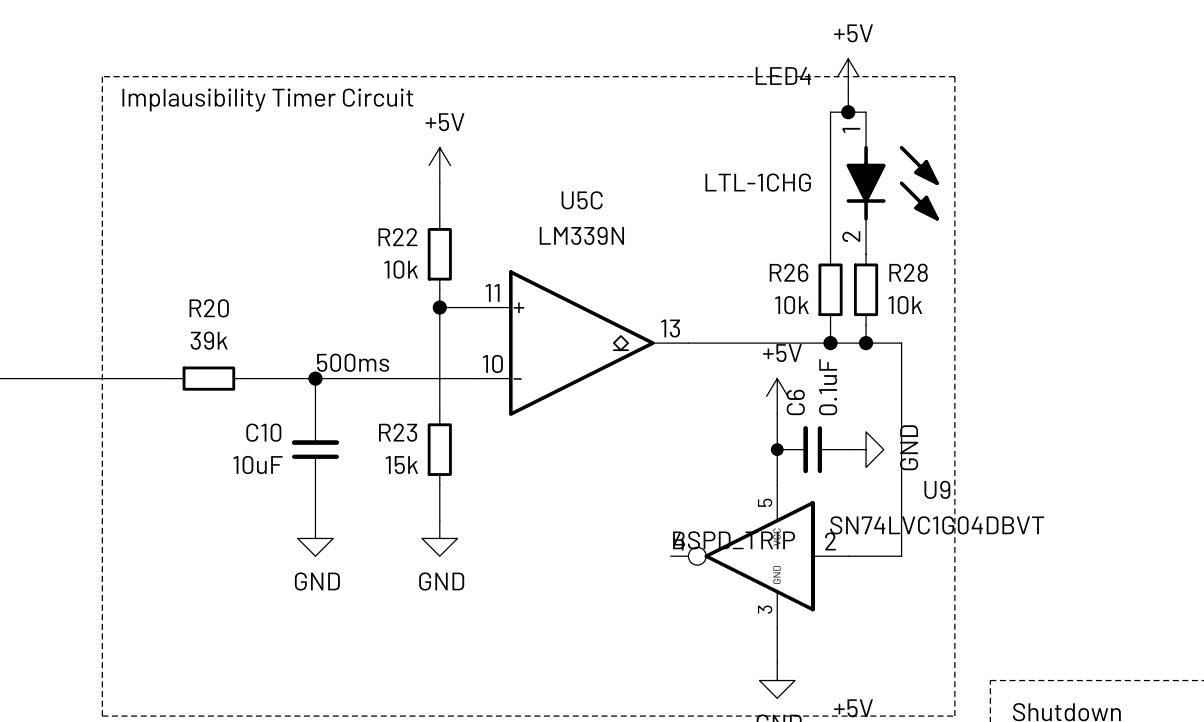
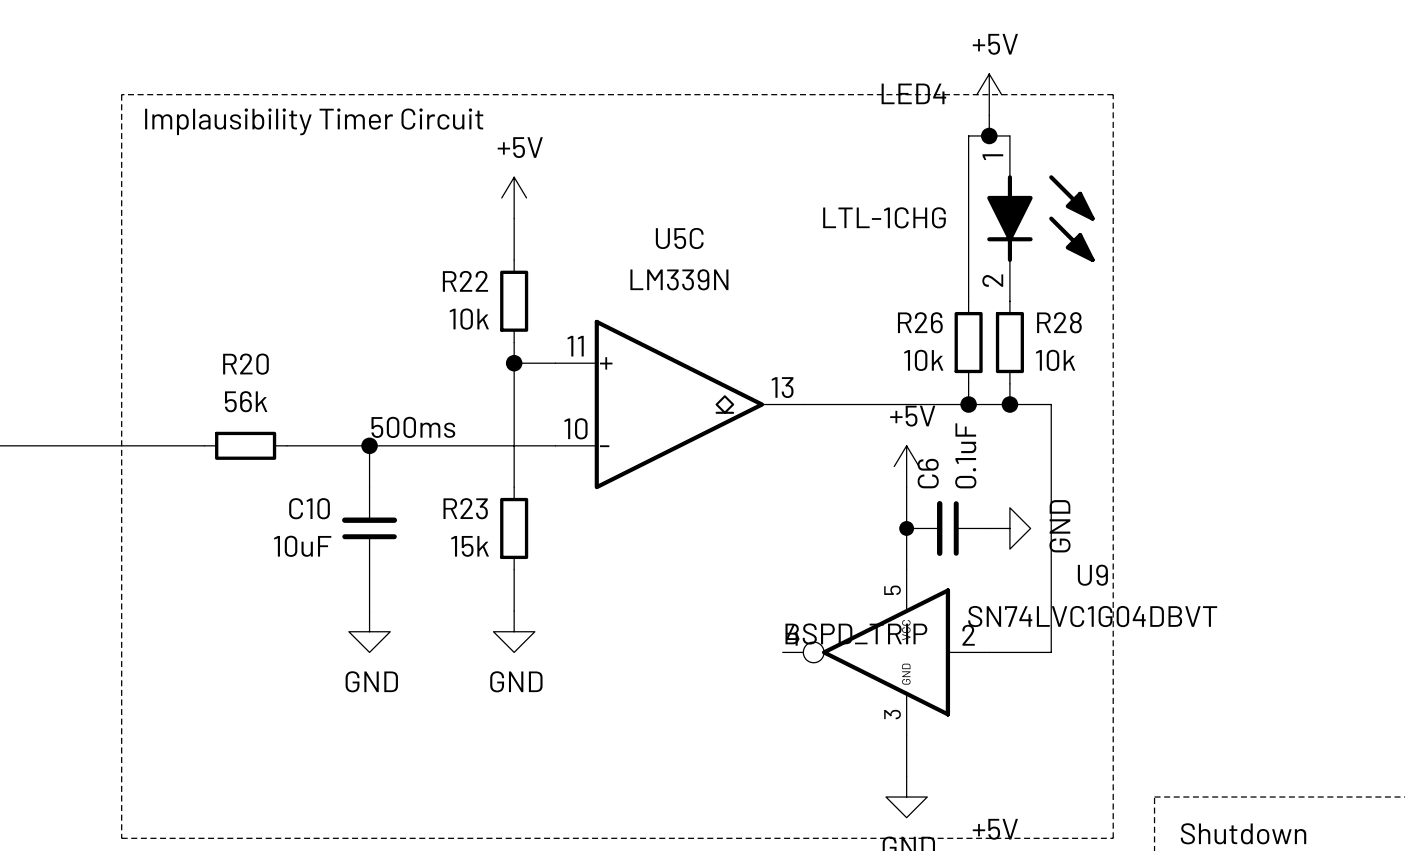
R20 value: 39k (209, 340) -> 56k (246, 401)

